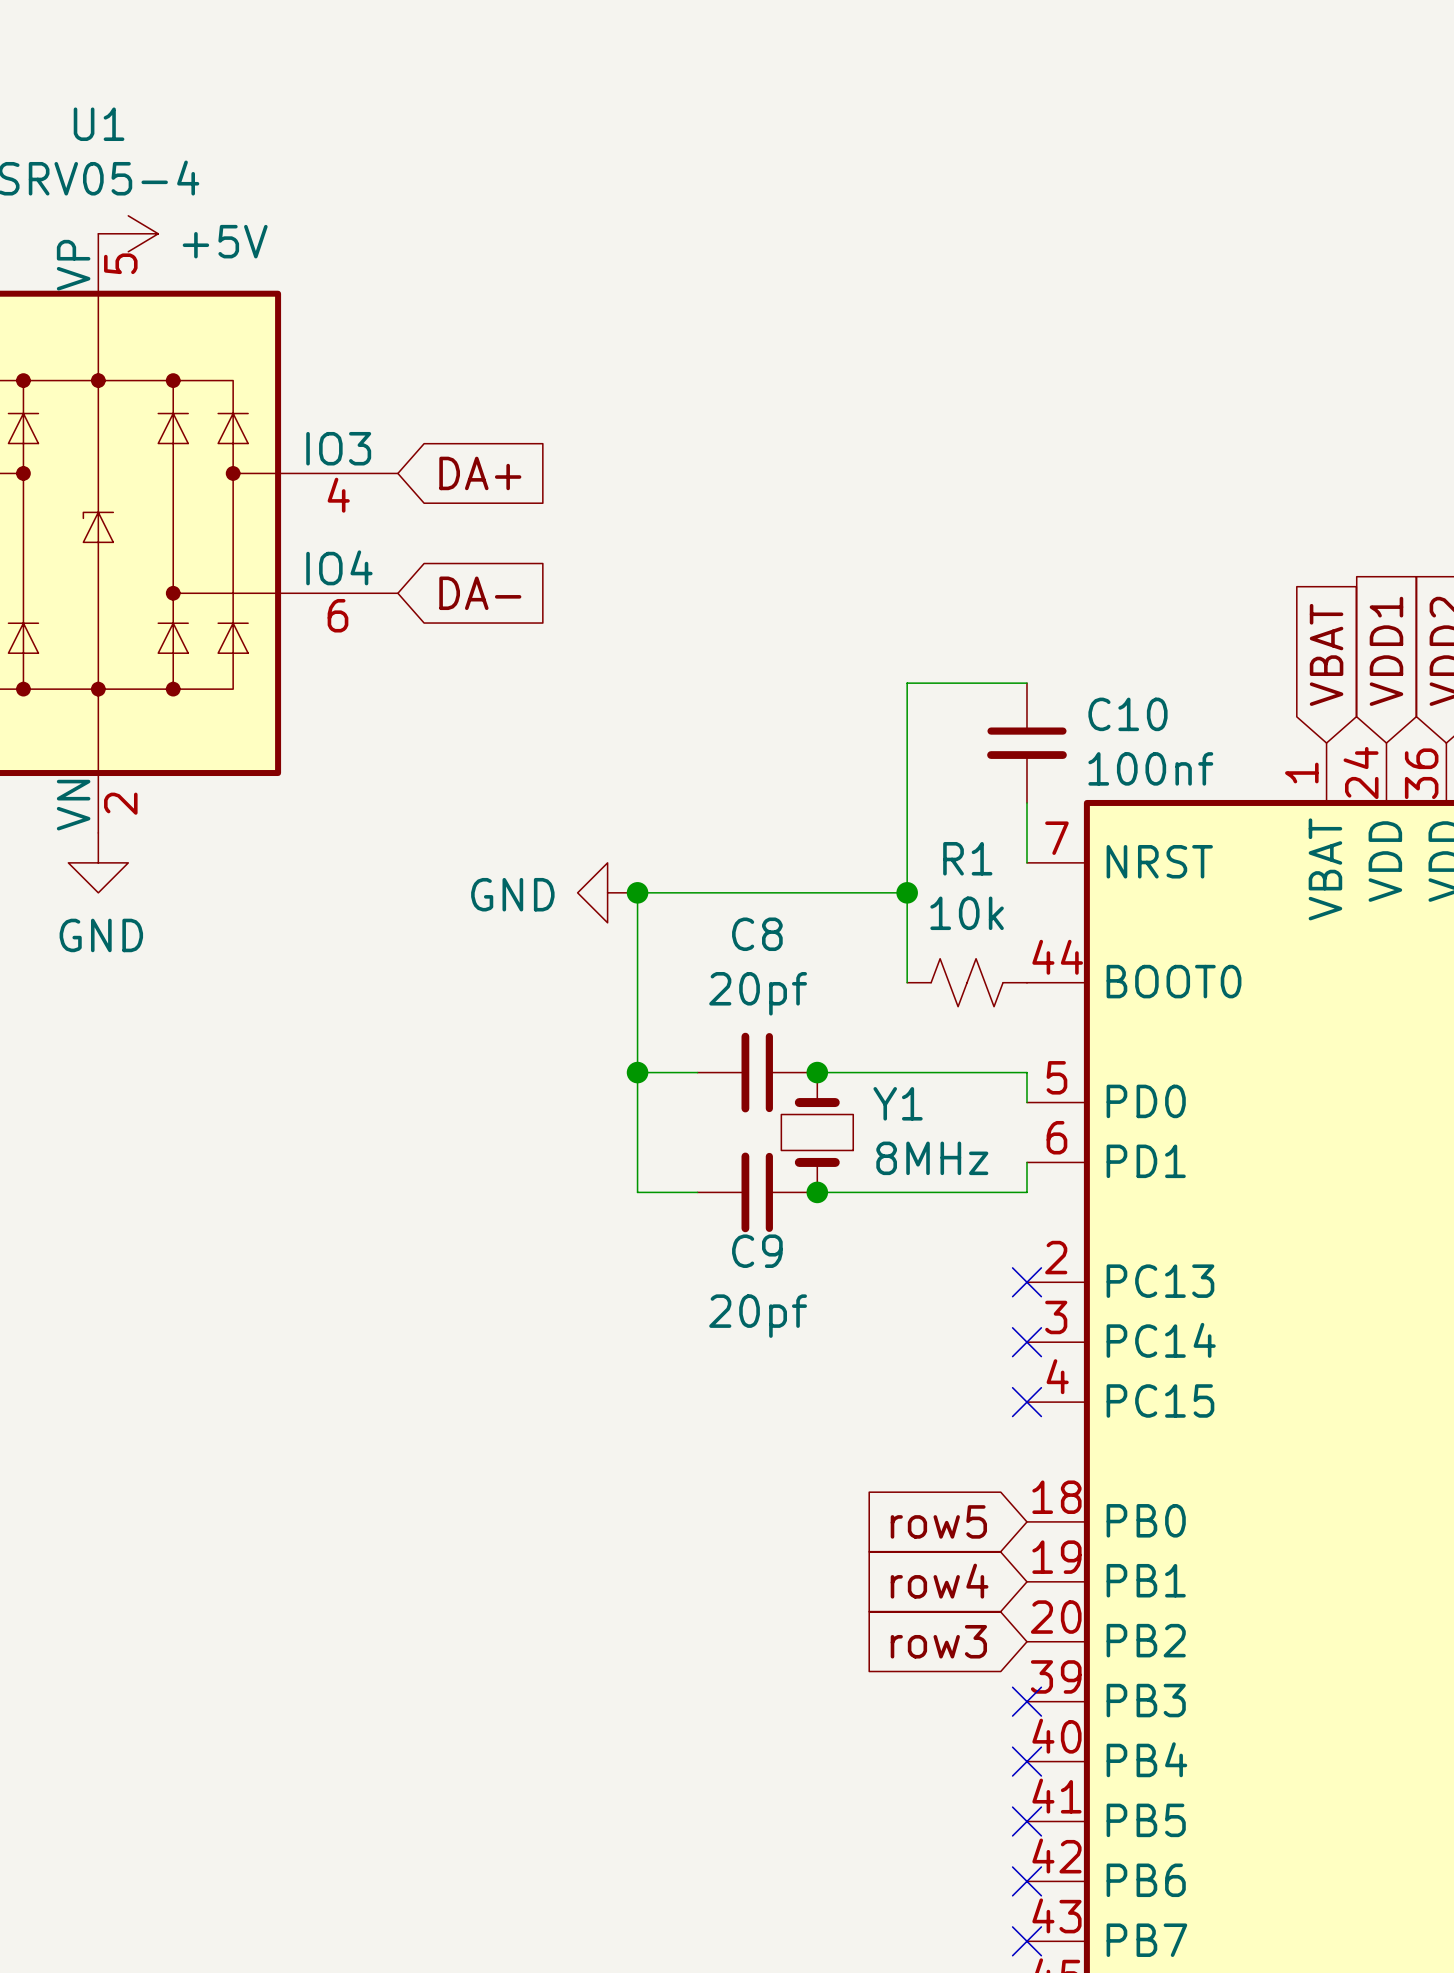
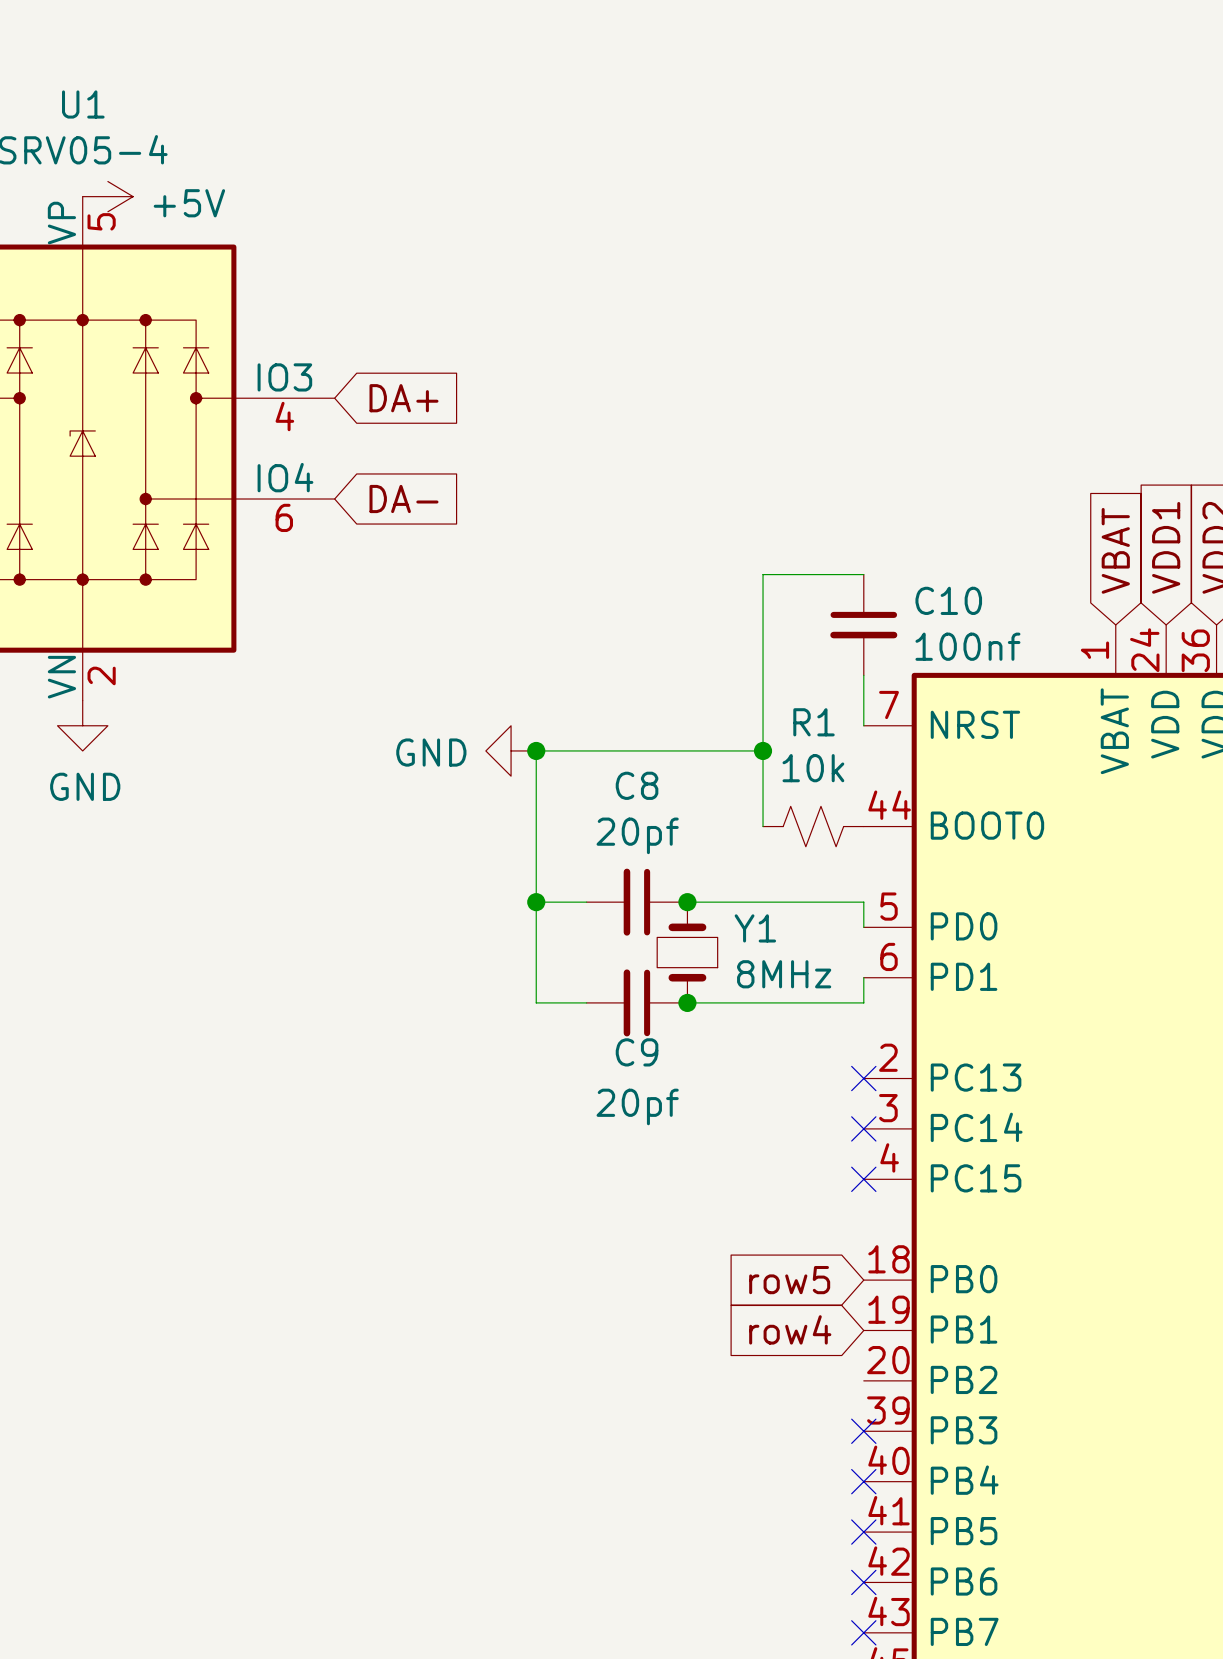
global label: row3 (938, 1641) -> none

